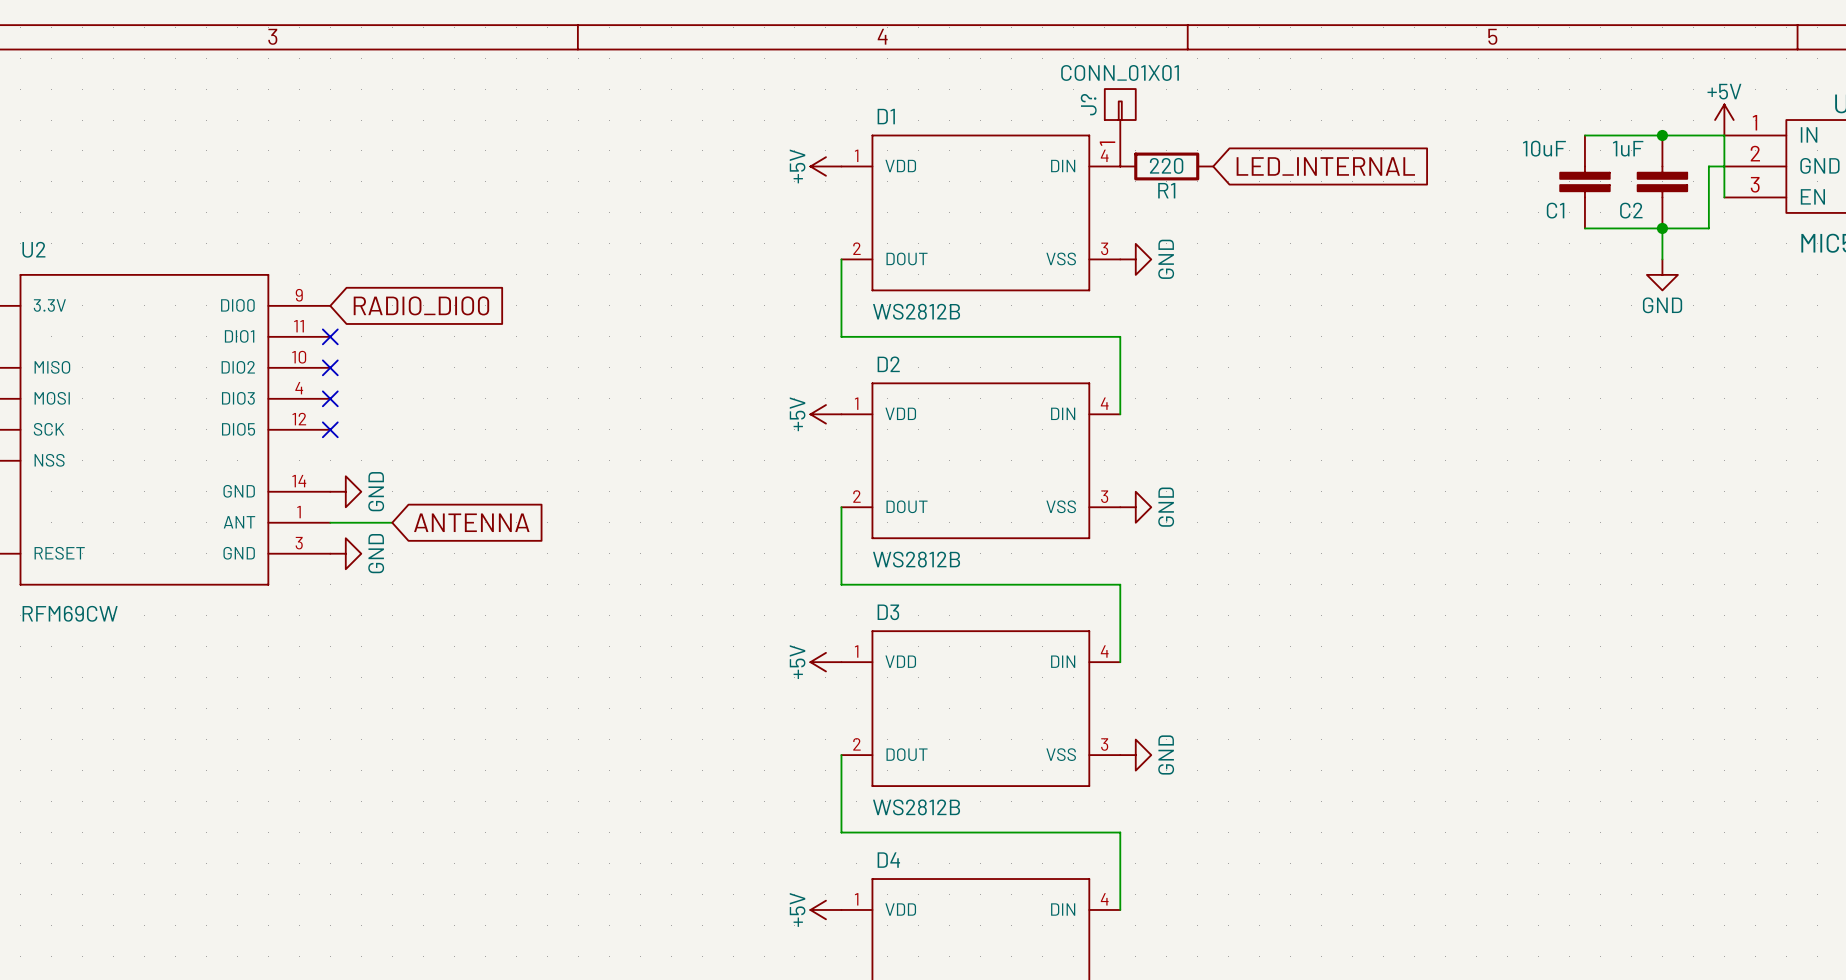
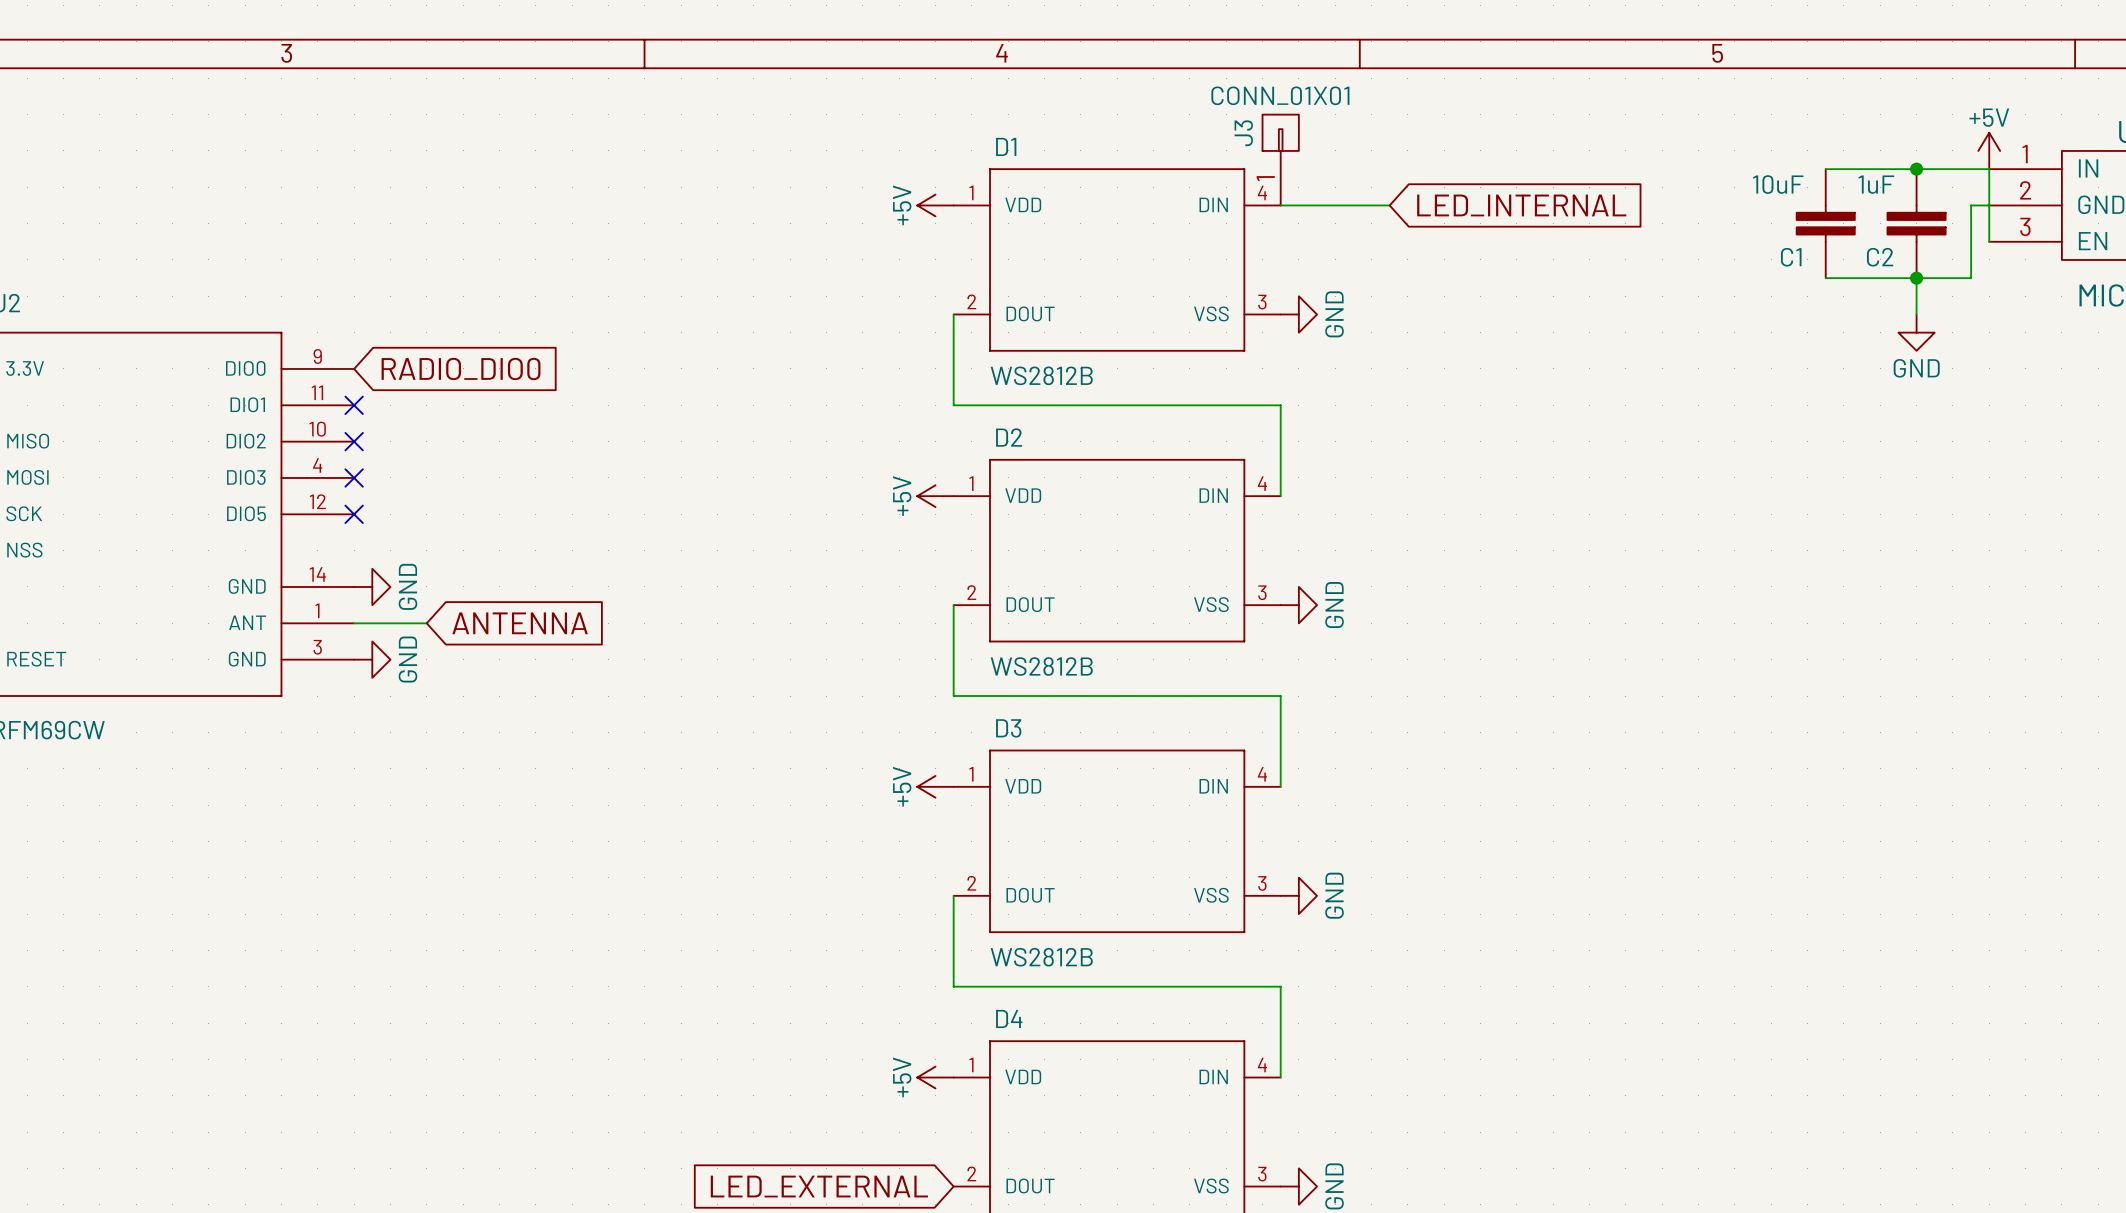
J? name: J? (1088, 104) -> J3 (1243, 133)
wire: none -> (1280, 205) (1389, 205)
R1: 220 (1166, 166) -> none

